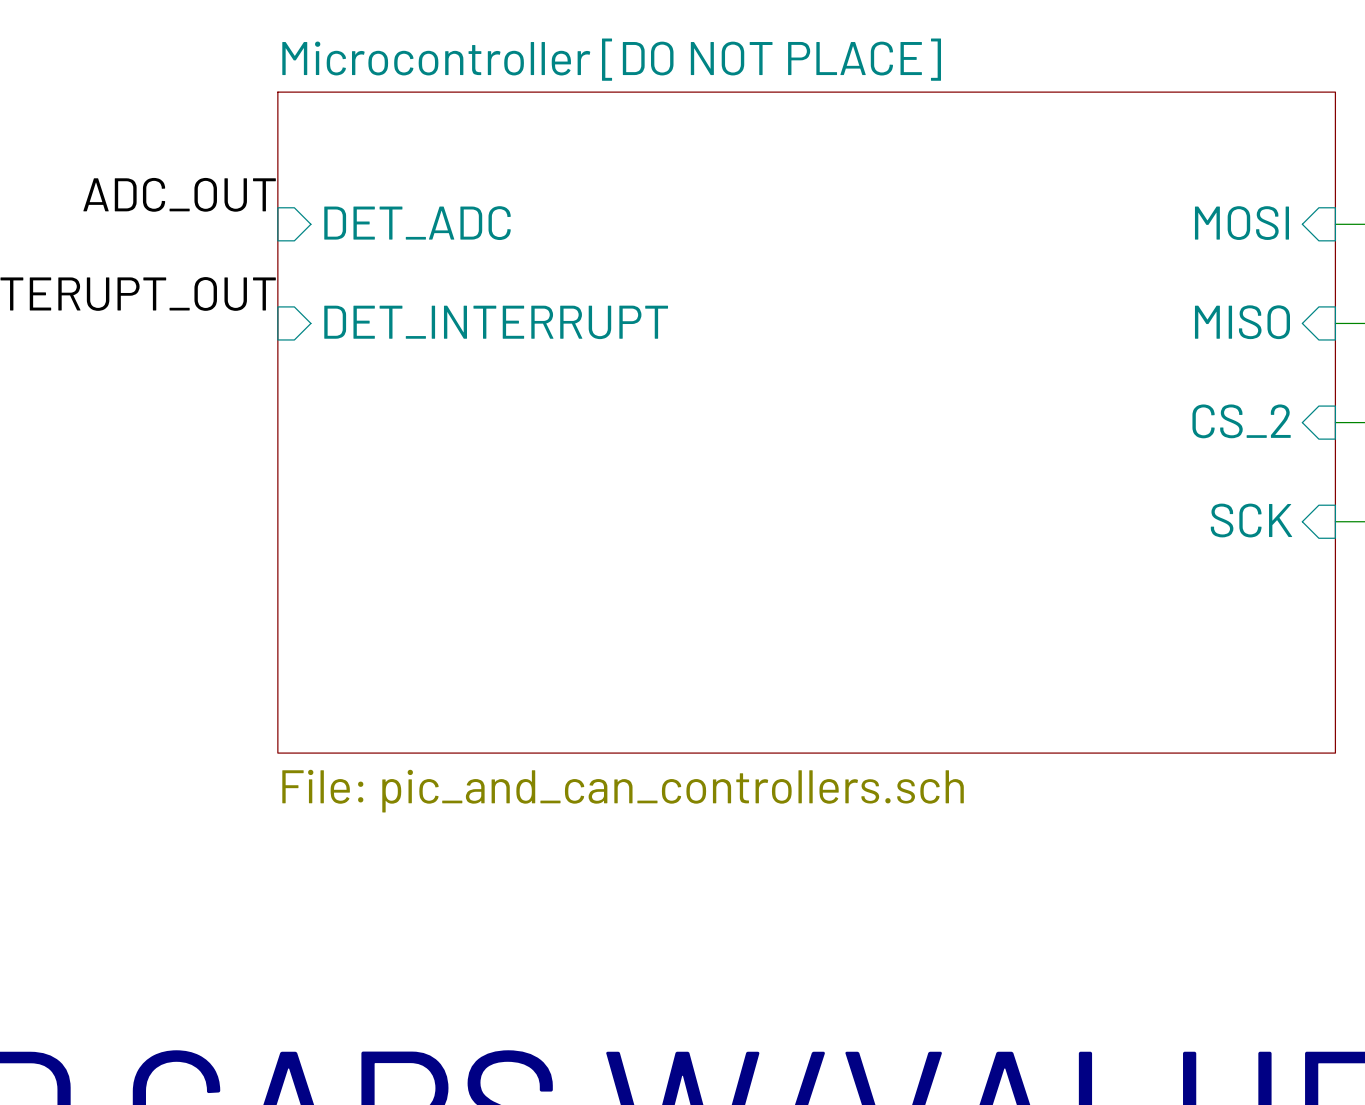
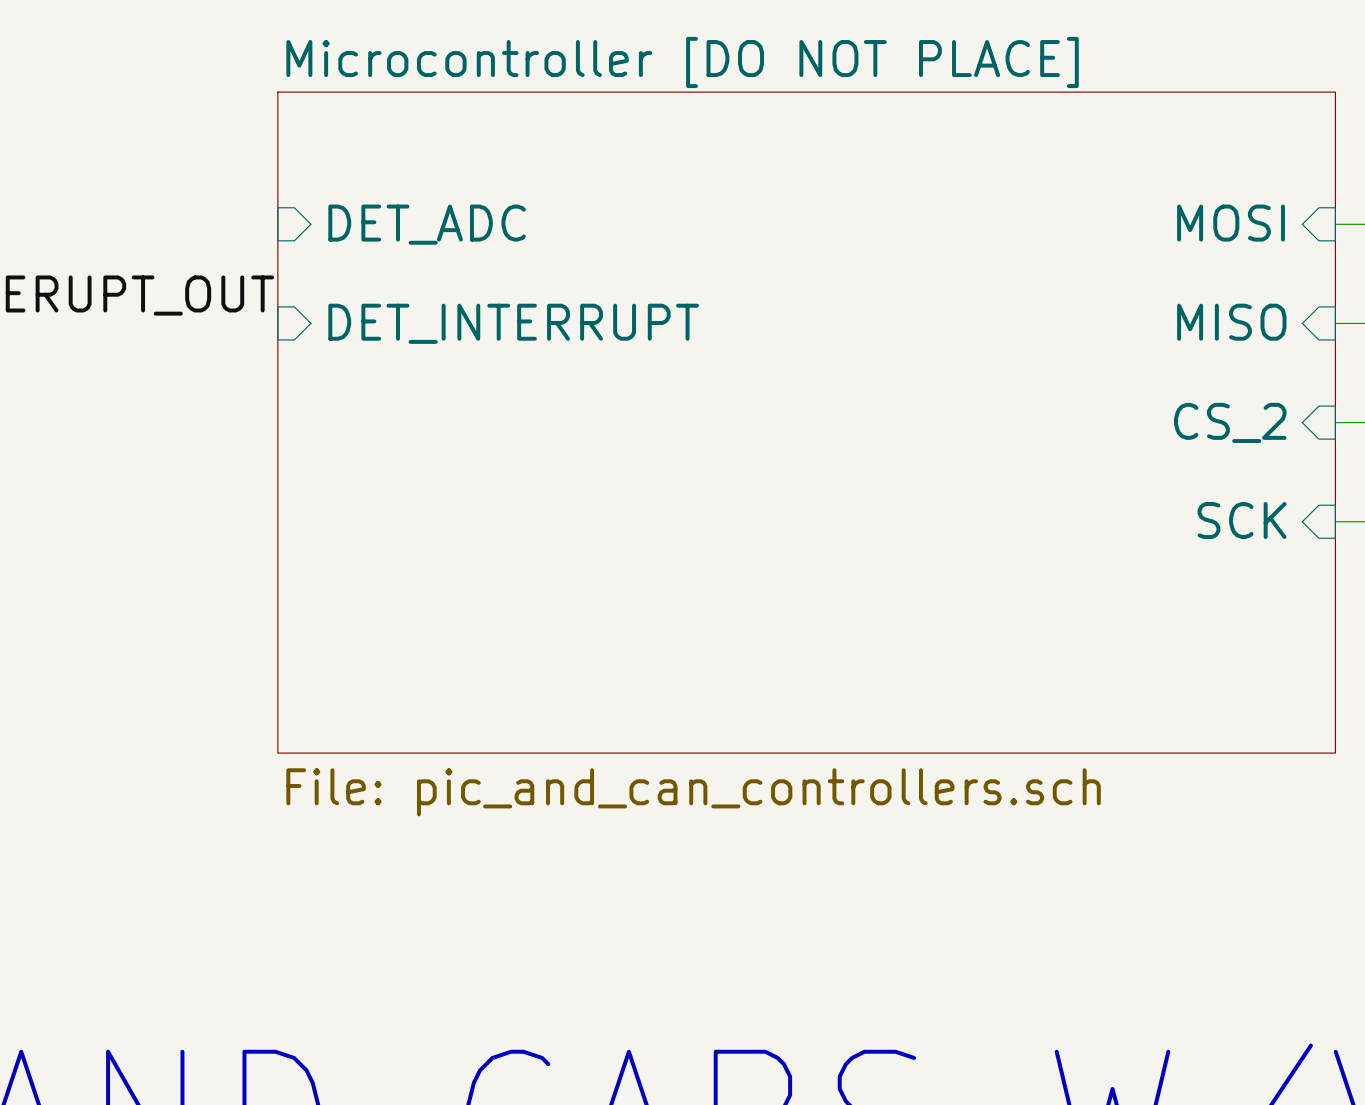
label: ADC_OUT (179, 194) -> none

